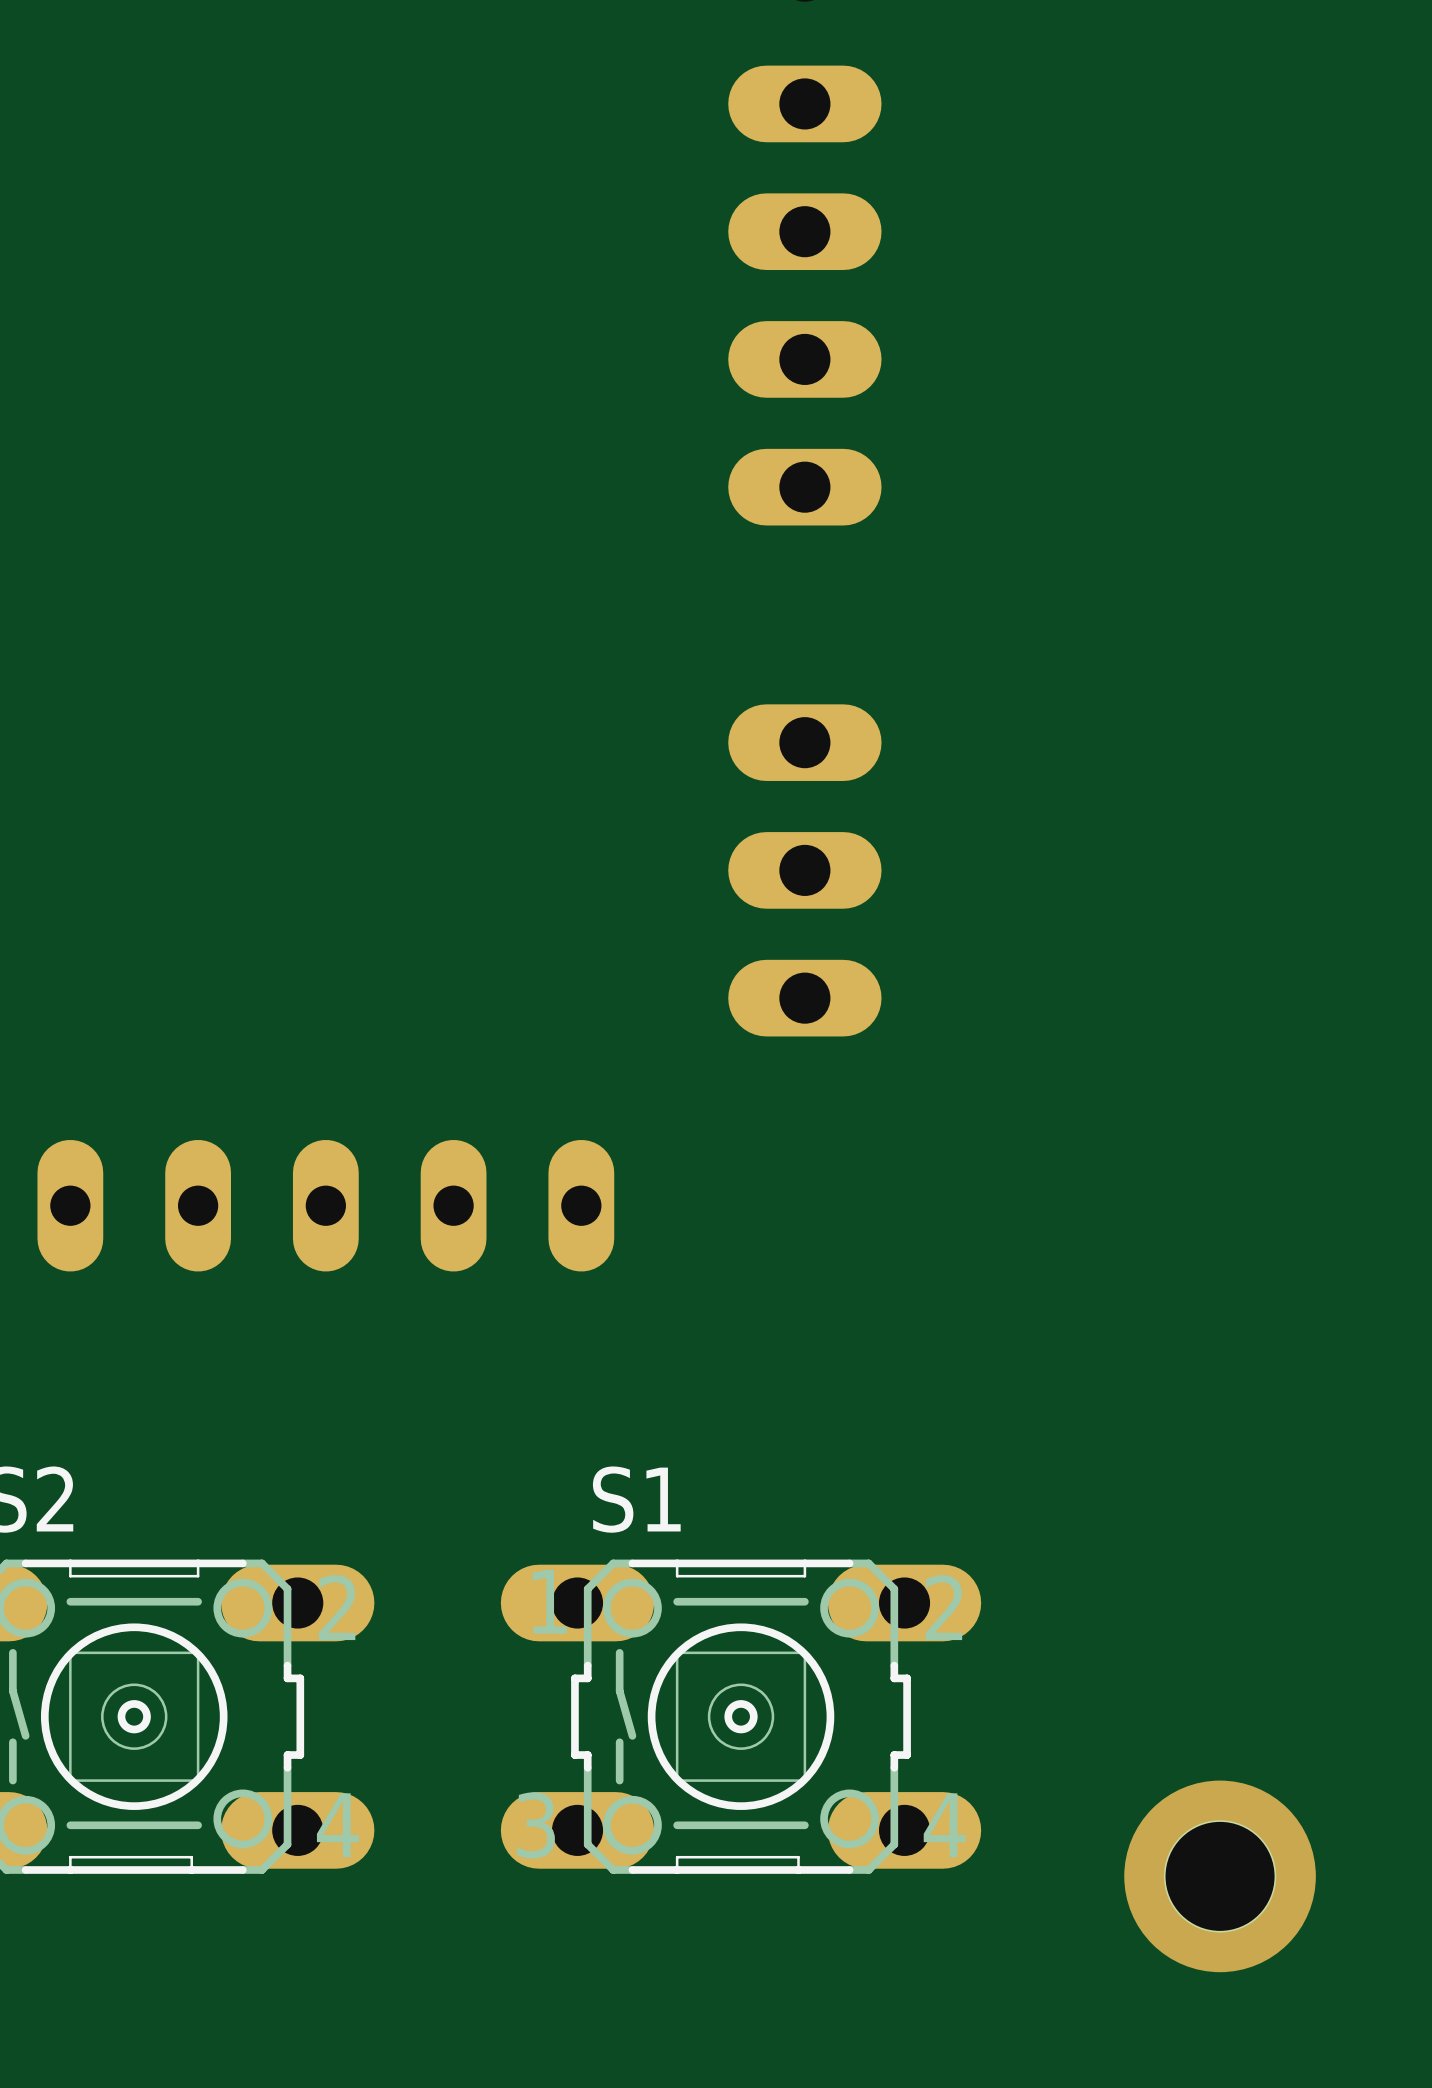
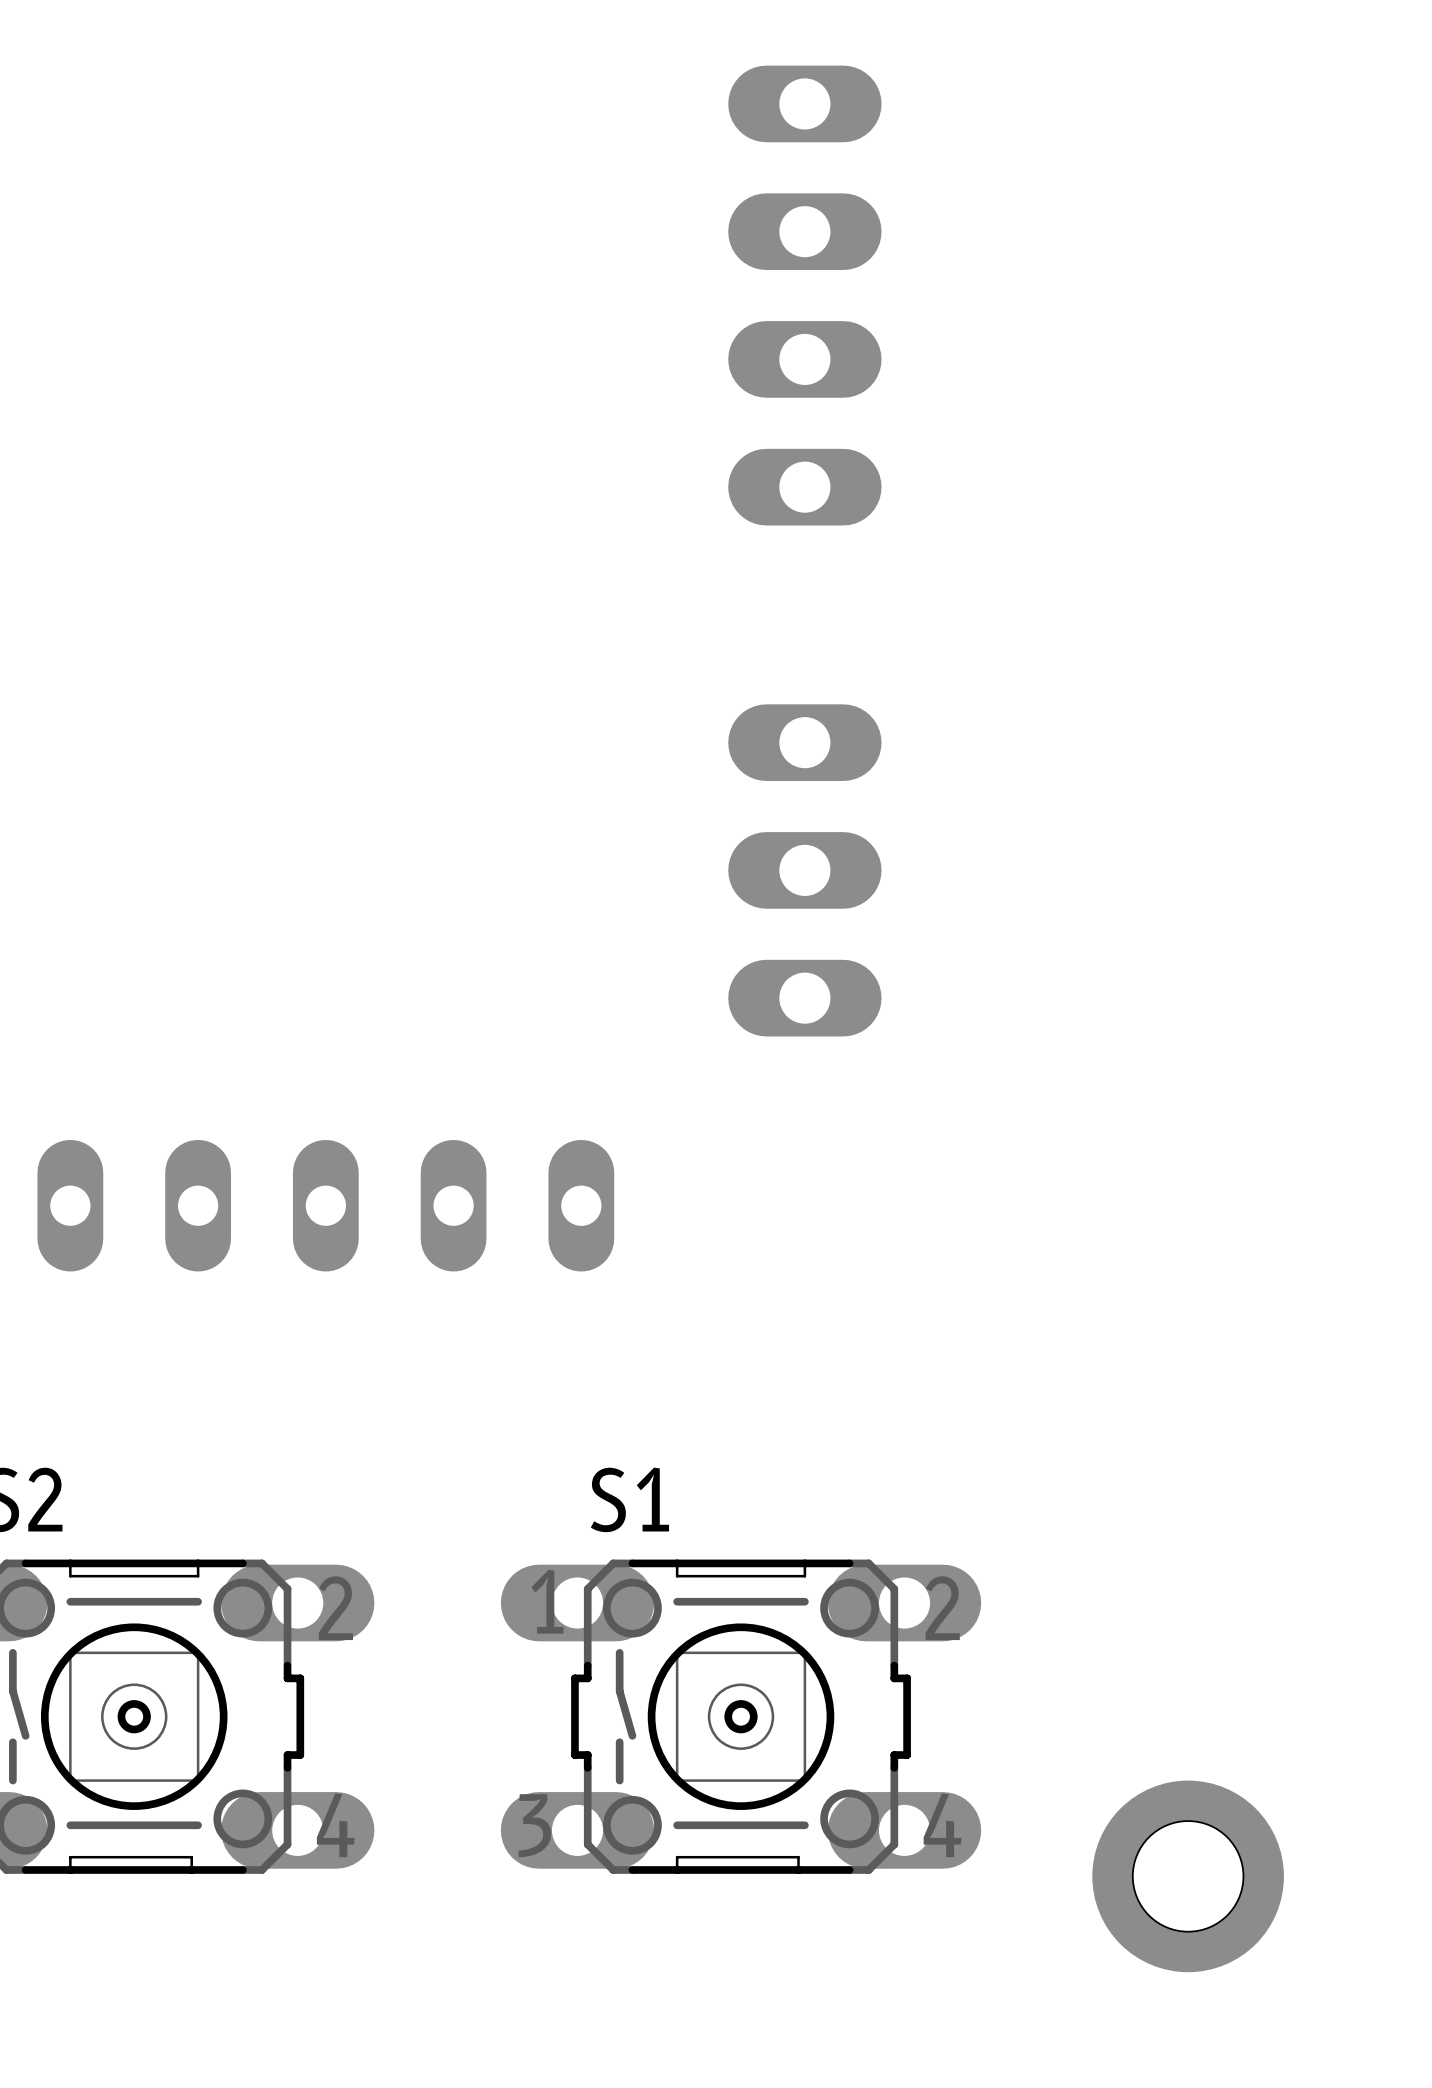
hole position: (1220, 1876) -> (1188, 1876)
via position: (1220, 1876) -> (1188, 1876)

